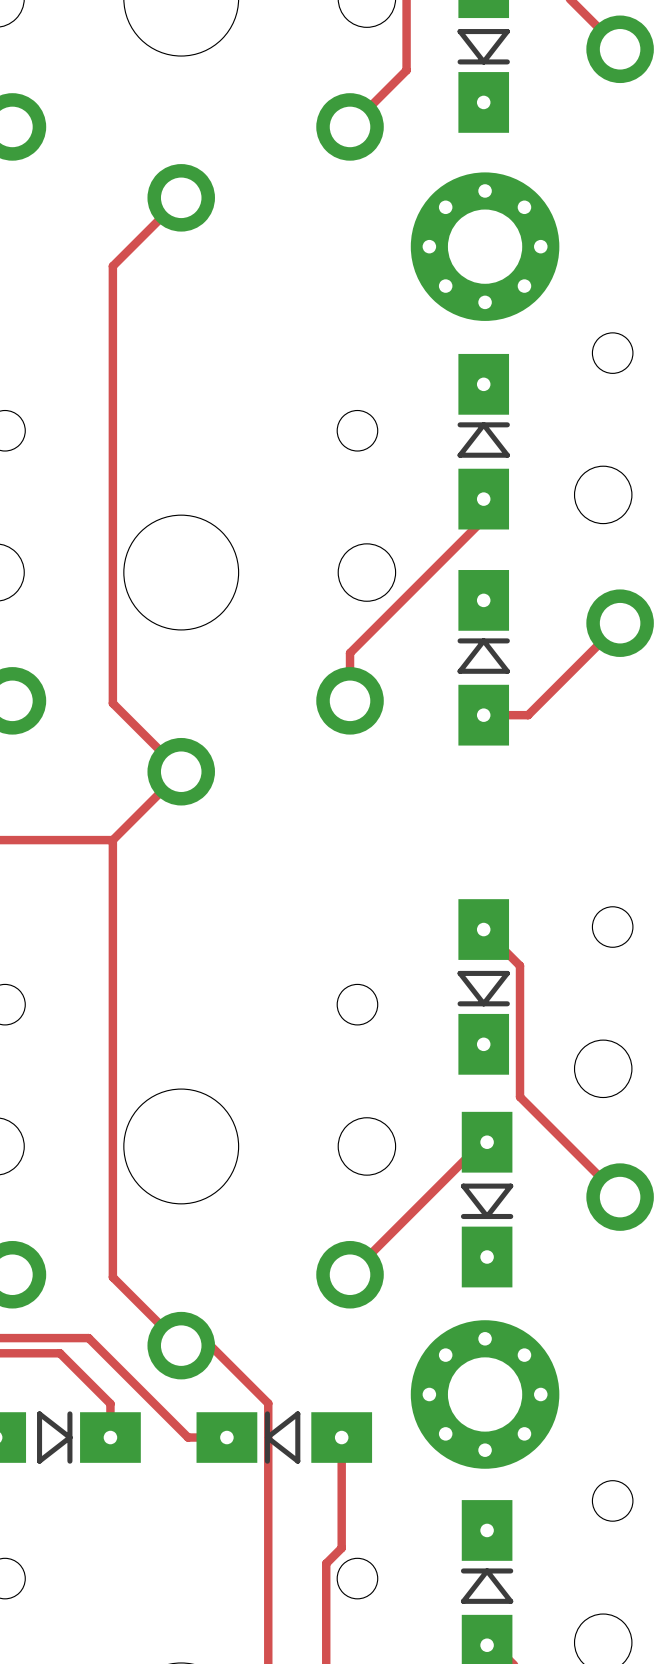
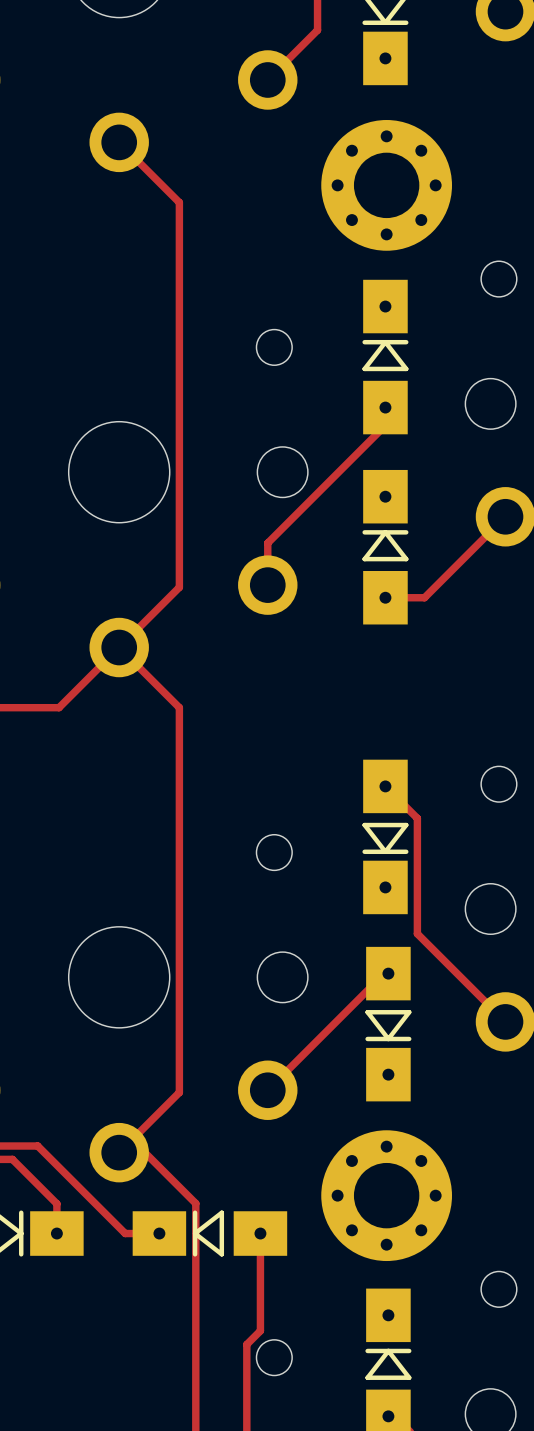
track: (181, 197) (112, 266) (112, 703) (181, 771) -> (119, 142) (179, 202) (179, 587) (119, 647) (179, 707) (179, 1092) (119, 1152)
track: (112, 840) (112, 1277) (181, 1345) -> none

